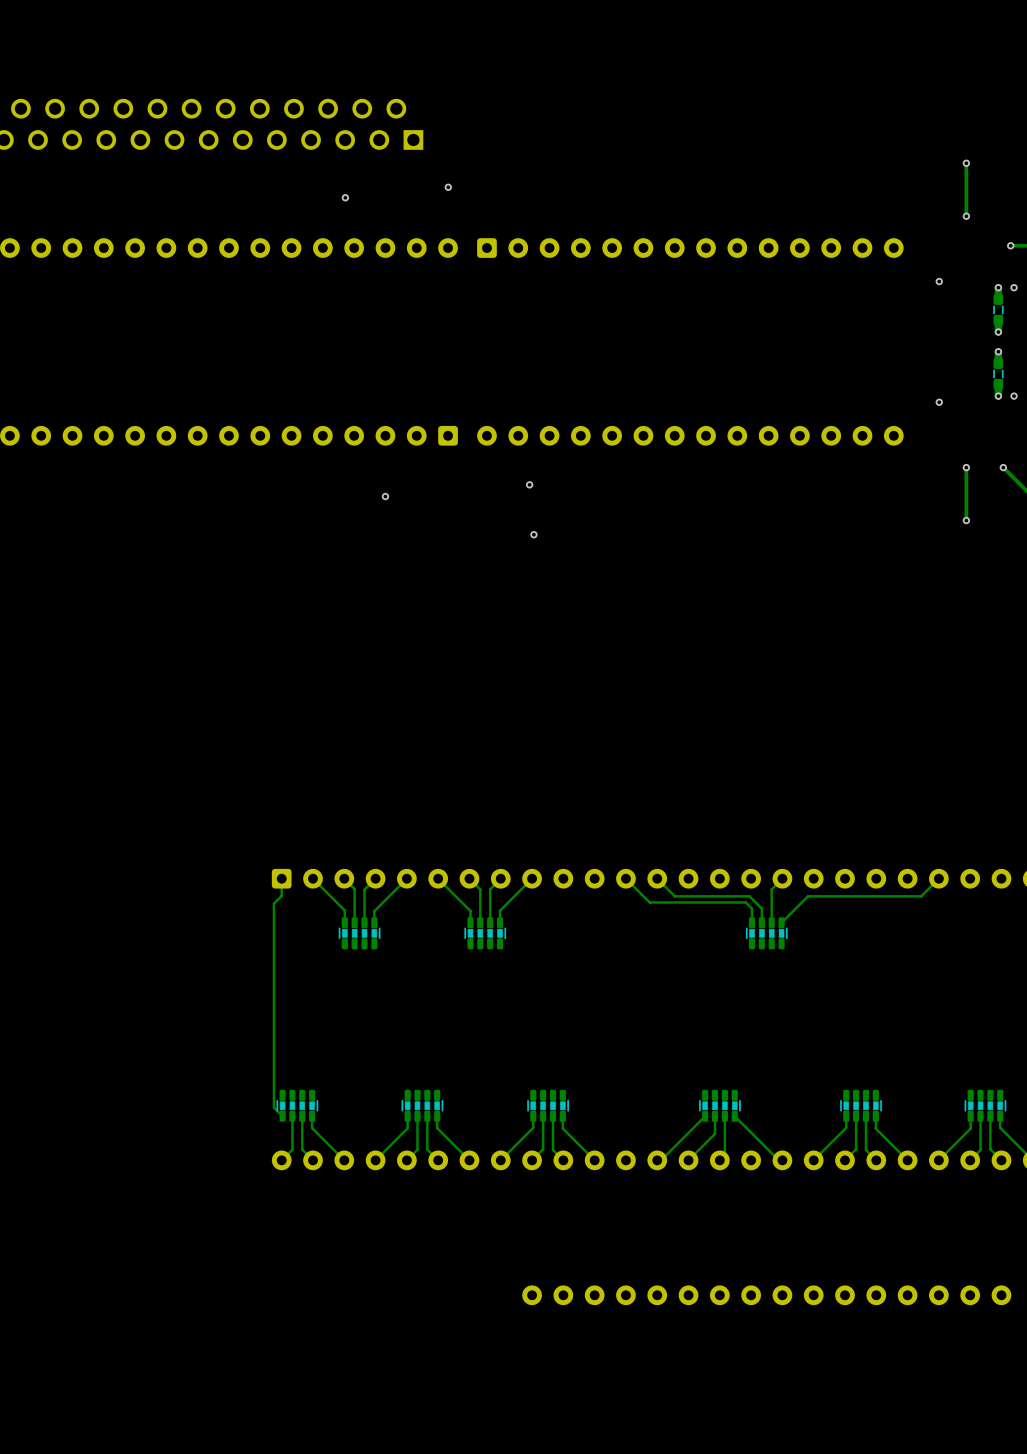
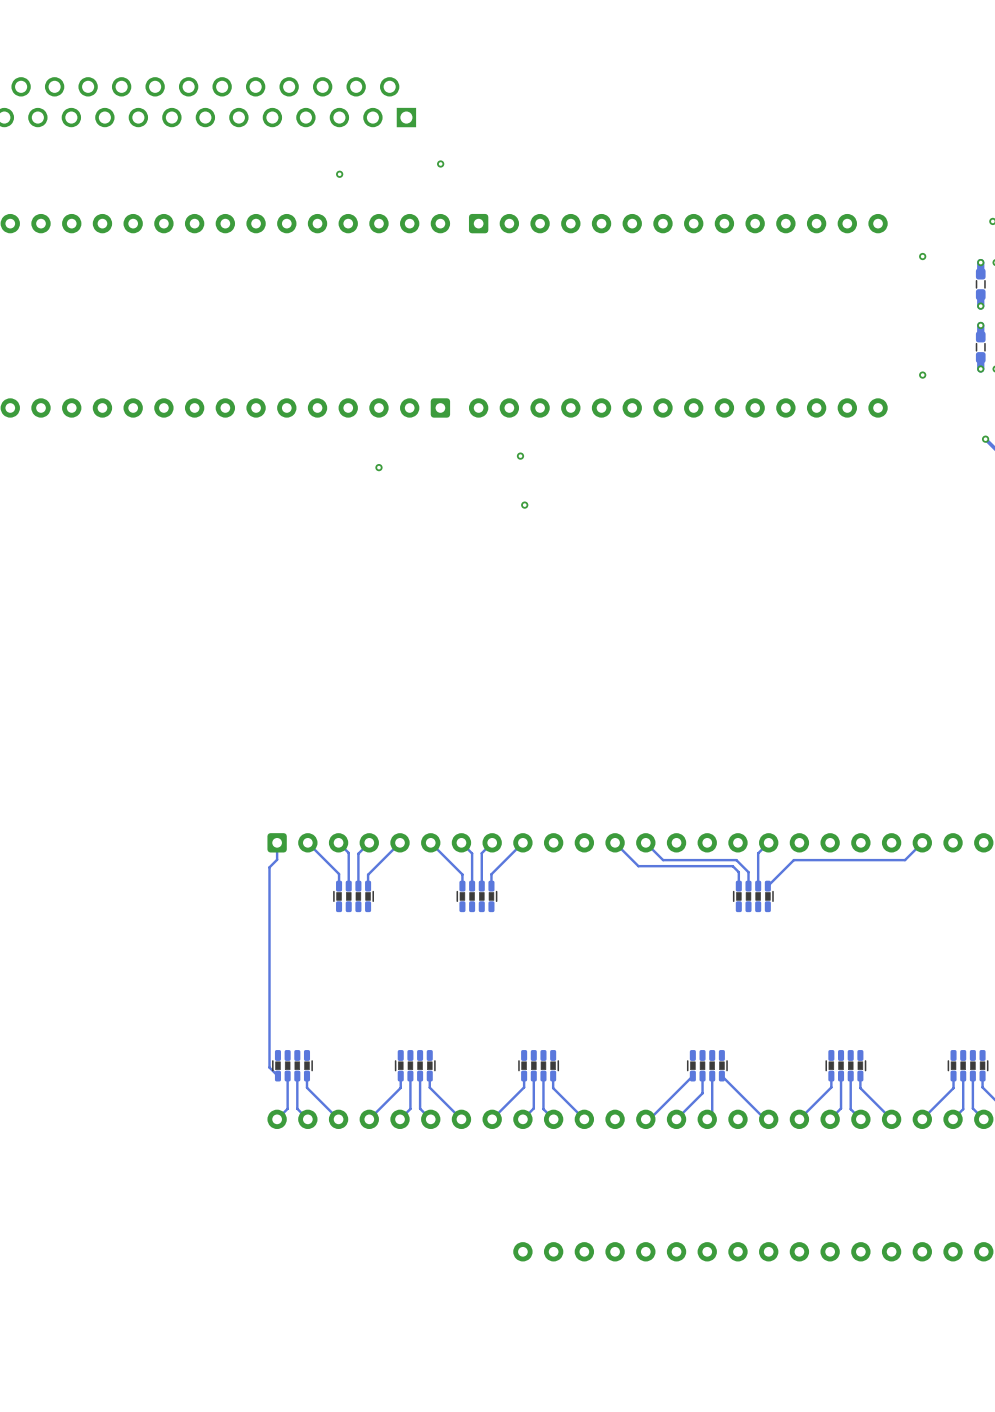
track: (966, 163) (966, 216) -> none
via: (966, 163) -> none
via: (966, 216) -> none
track: (966, 467) (966, 520) -> none
via: (966, 467) -> none
via: (966, 520) -> none

